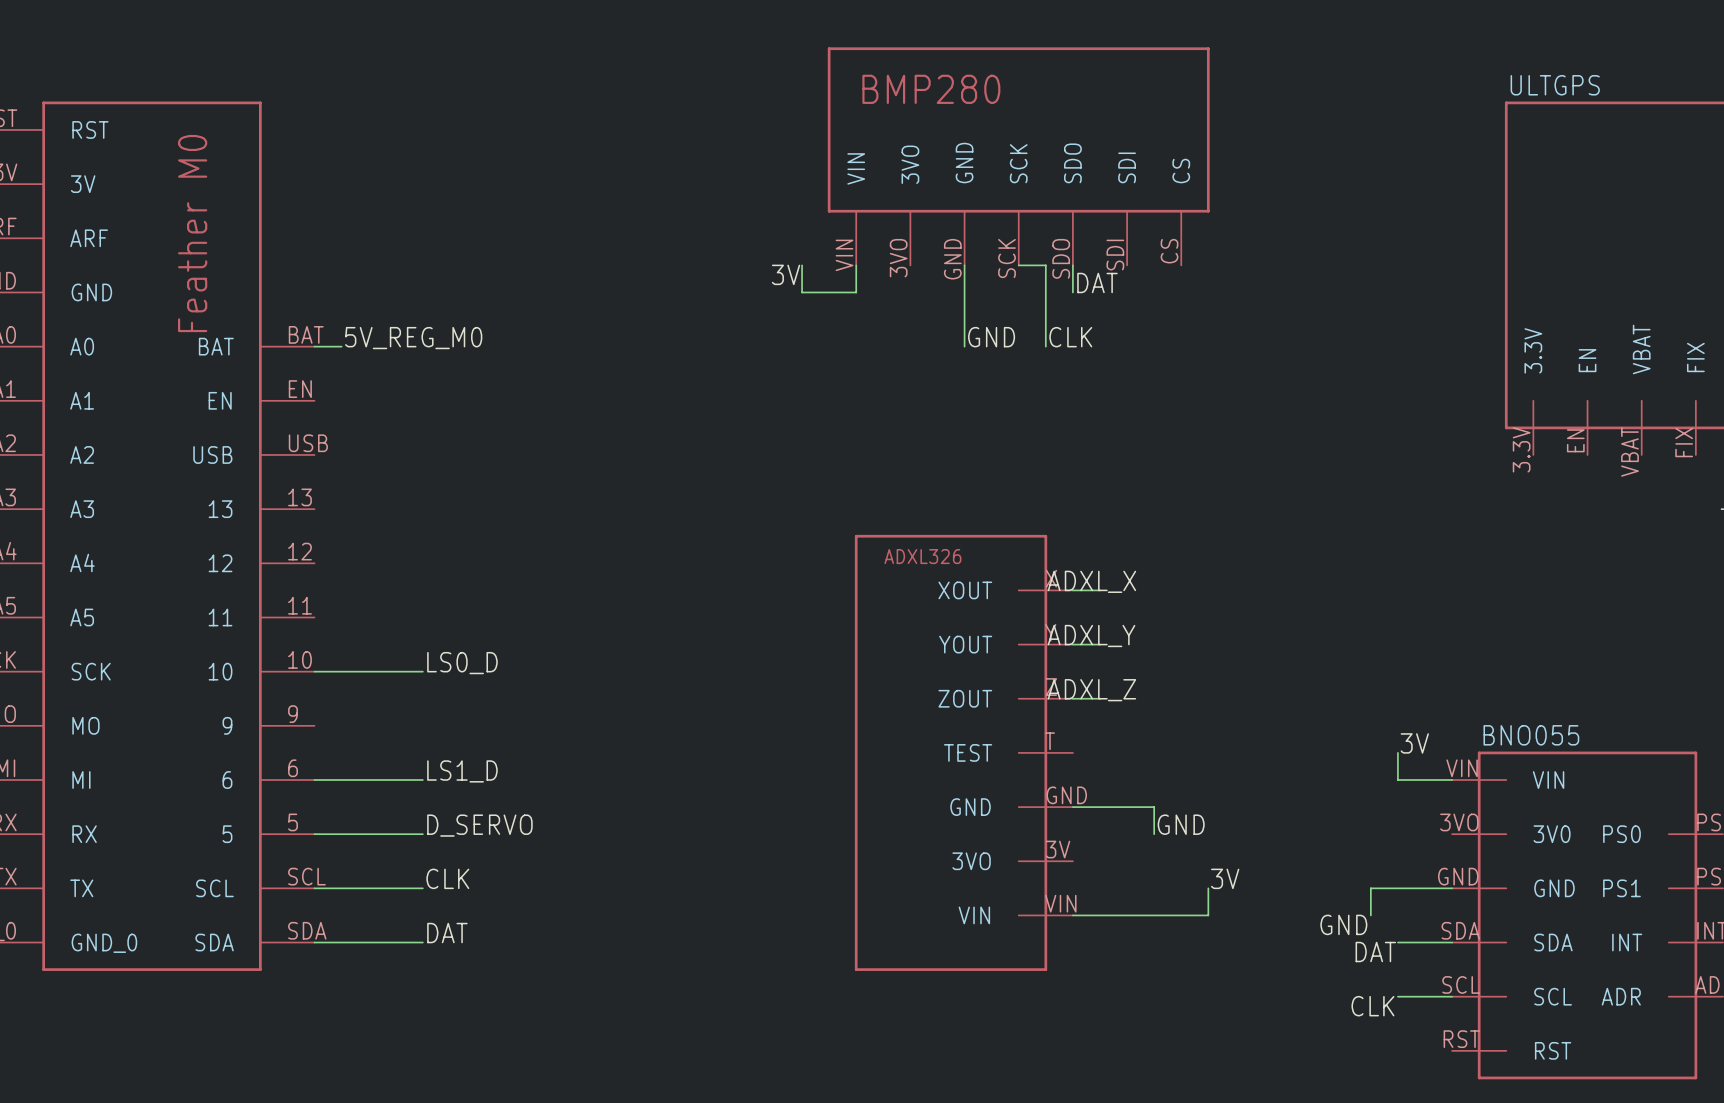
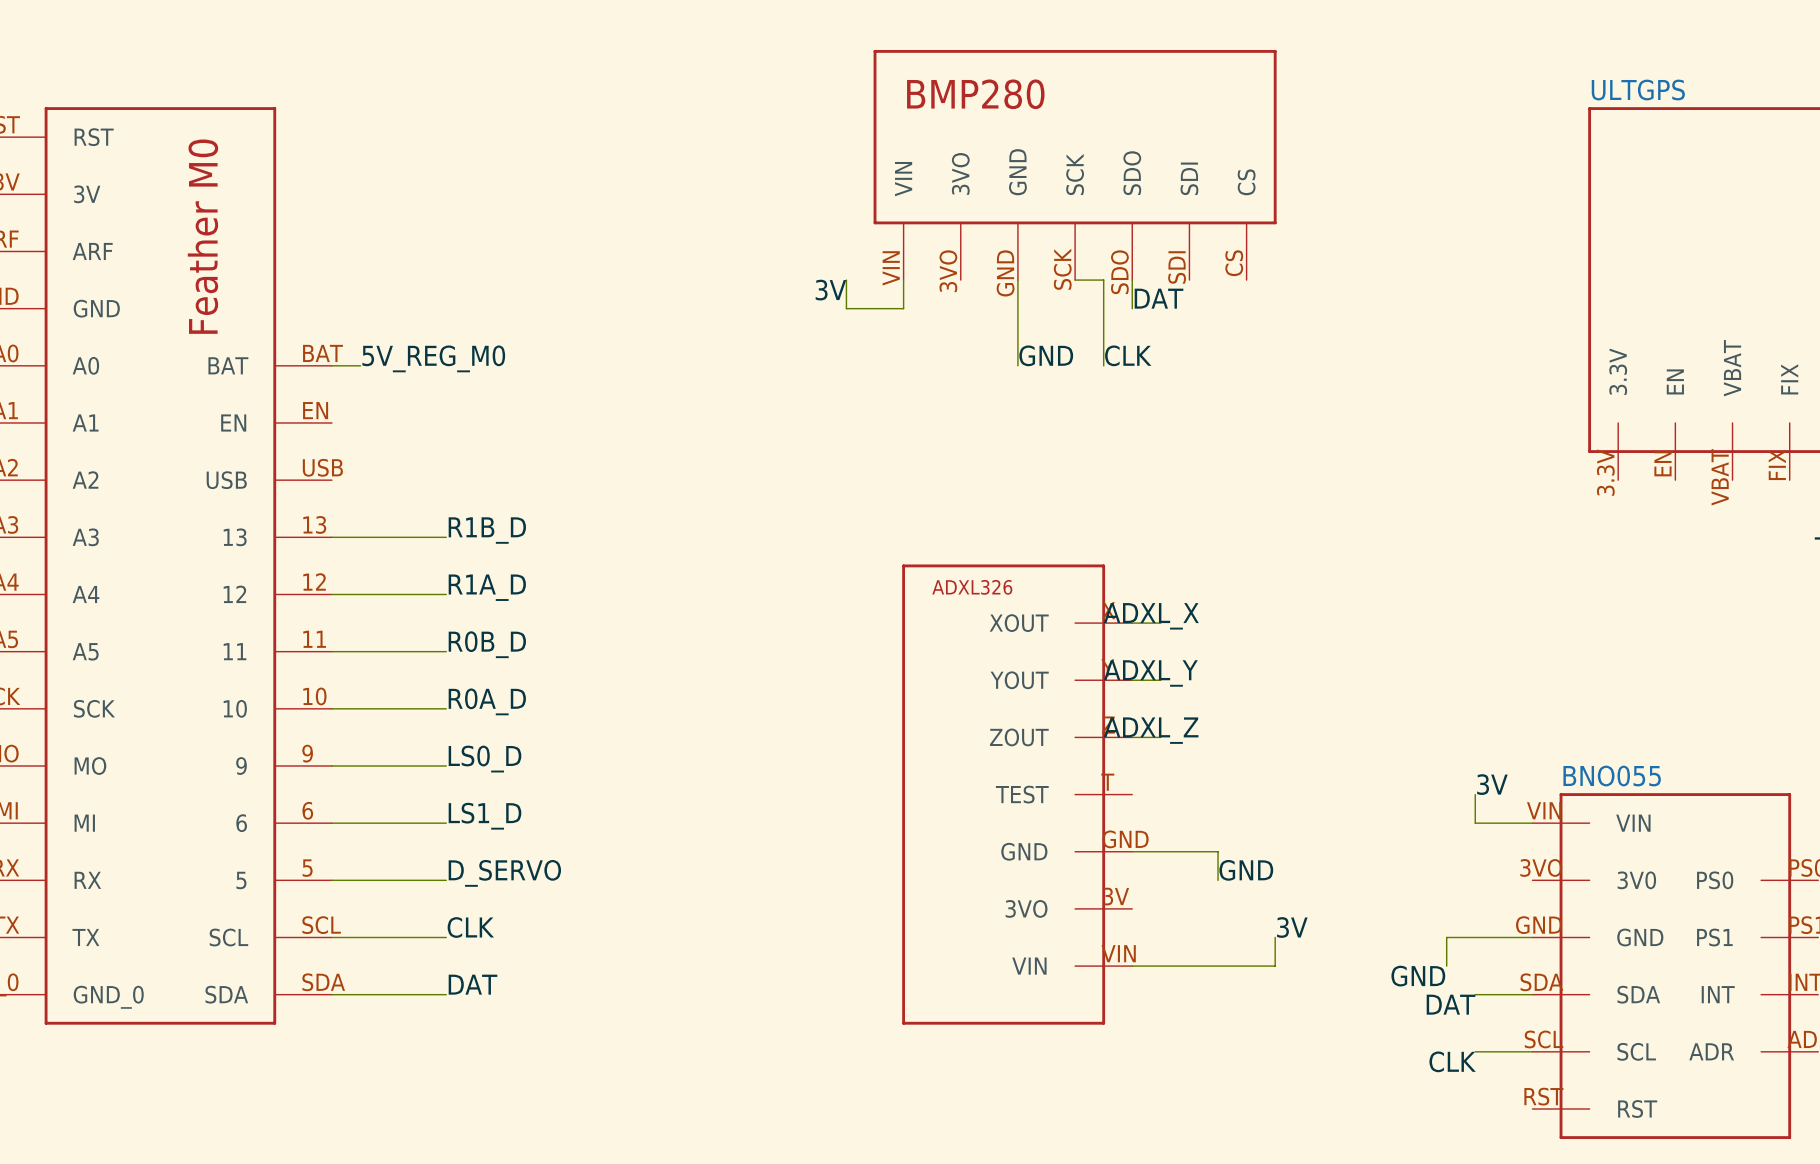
label: none -> R1B_D (487, 530)
wire: none -> (331, 537) (446, 537)
label: none -> R1A_D (487, 587)
wire: none -> (331, 594) (446, 594)
label: none -> R0B_D (487, 644)
wire: none -> (331, 651) (446, 651)
label: LS0_D (462, 663) -> R0A_D (487, 701)
label: none -> LS0_D (485, 759)
wire: none -> (331, 765) (446, 765)

